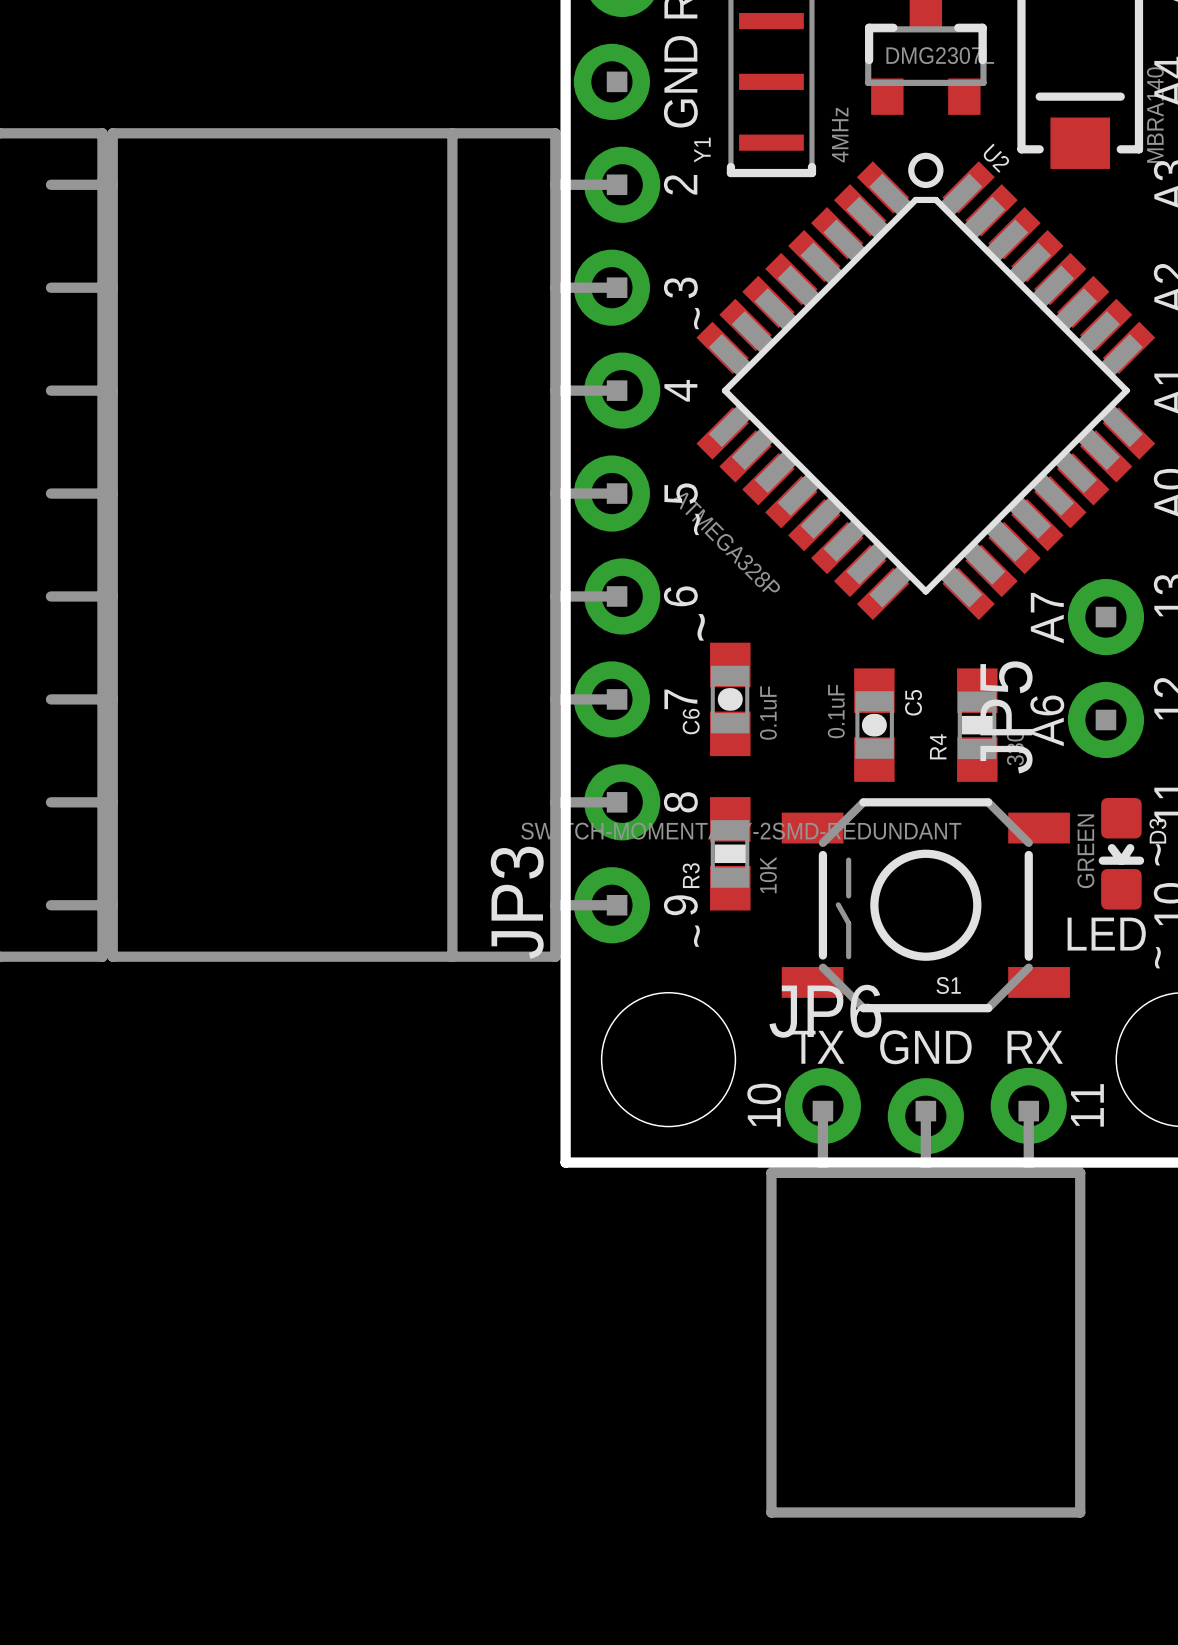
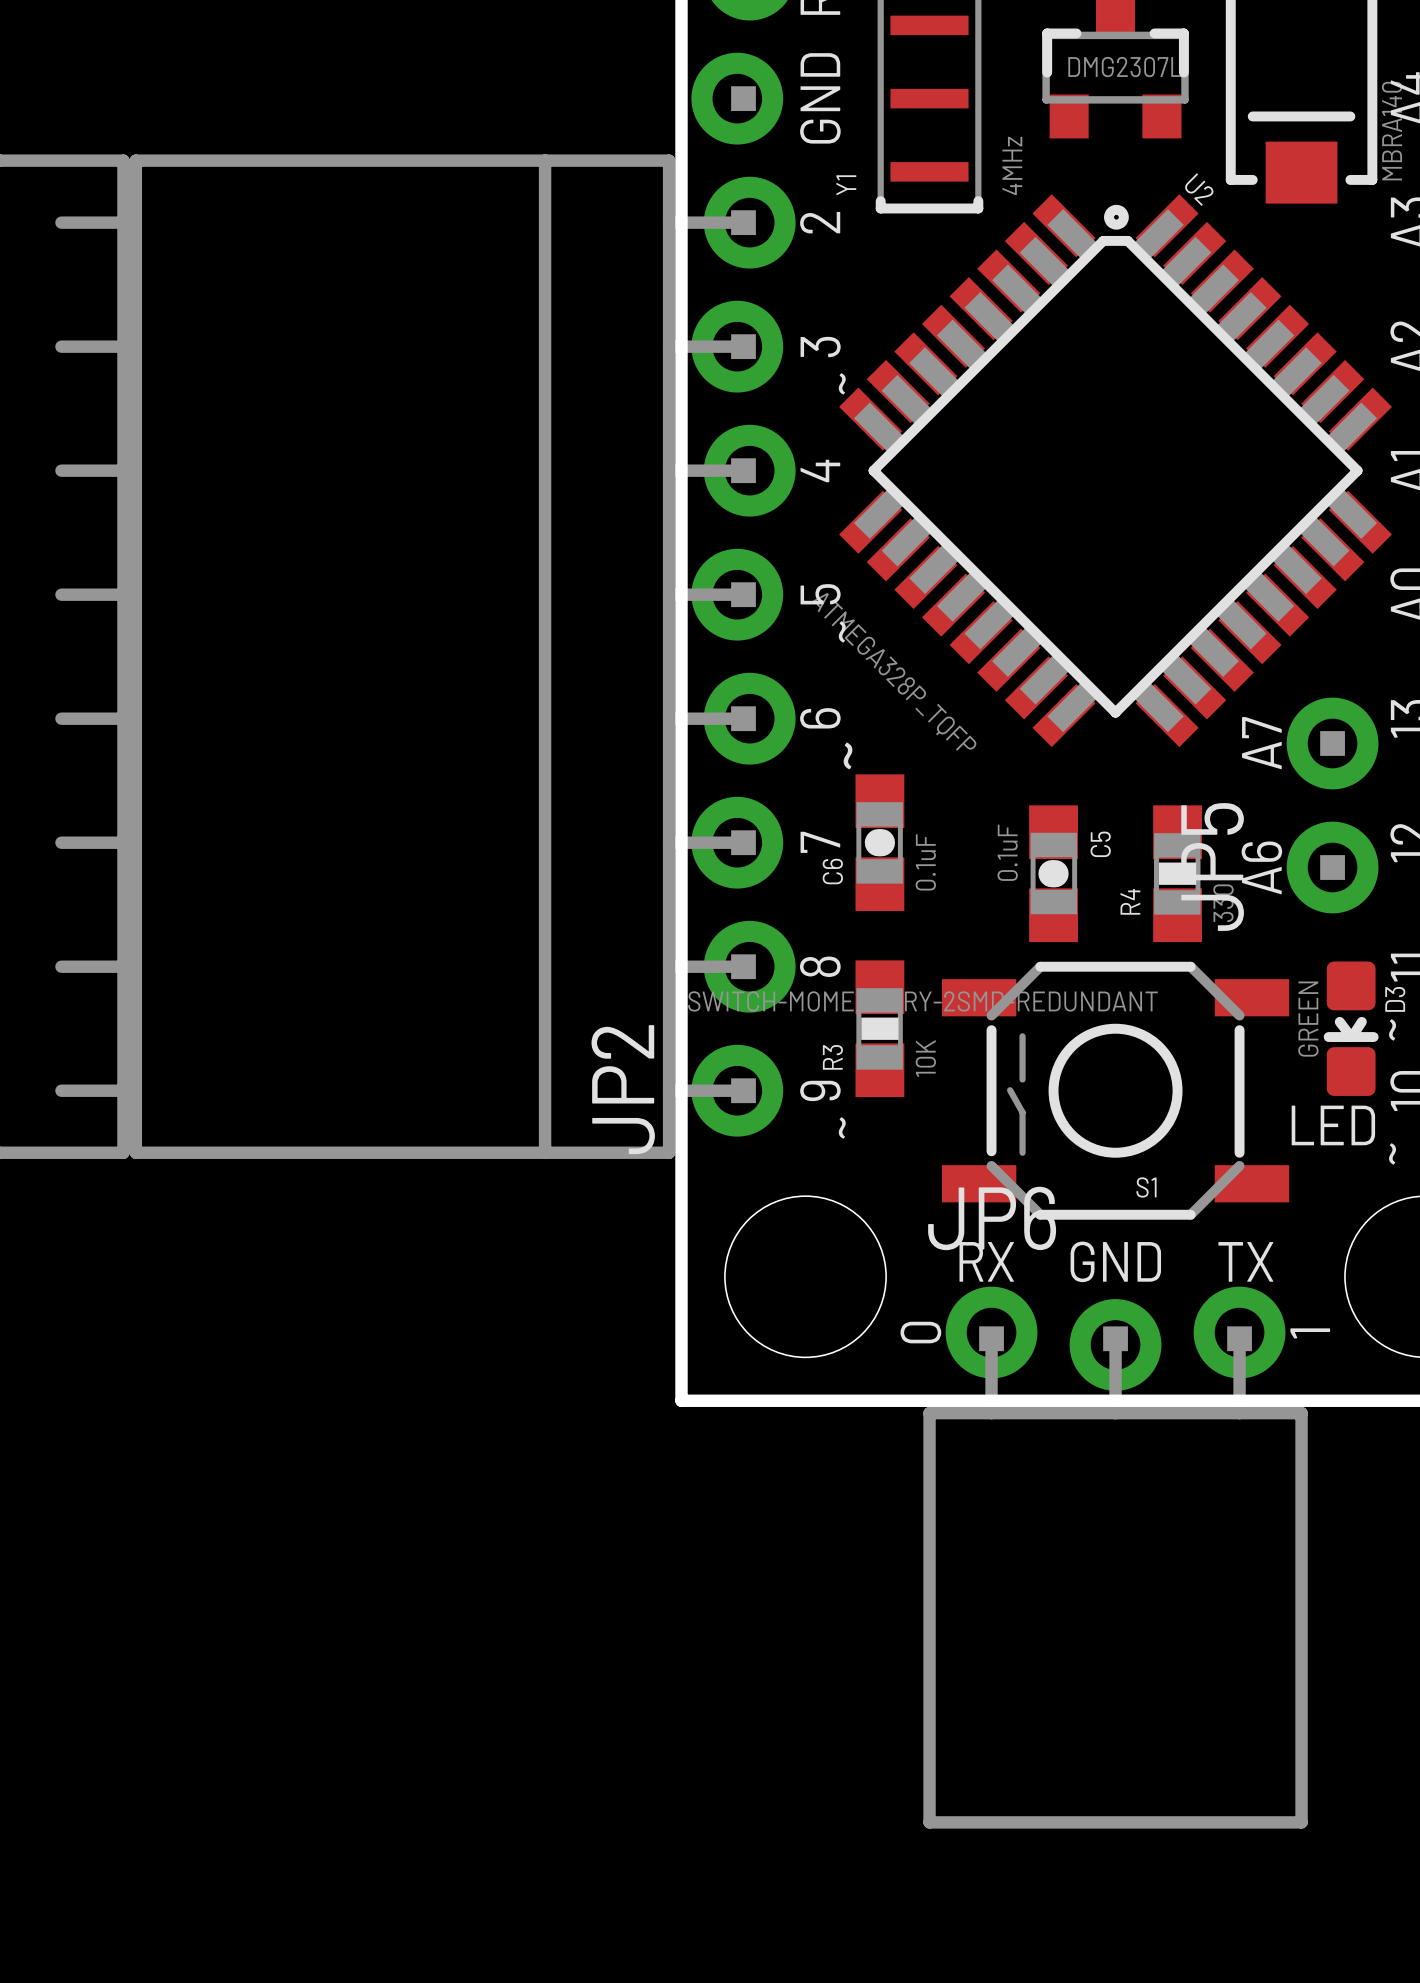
U2 footprint: [696, 152, 1156, 621] -> [839, 194, 1392, 748]
U2 value: ATMEGA328P (725, 542) -> ATMEGA328P_TQFP (892, 671)
JP3 name: JP3 (517, 902) -> JP2 (623, 1089)
text: TX (817, 1047) -> RX (986, 1261)
text: RX (1035, 1047) -> TX (1245, 1261)
text: 10 (764, 1105) -> 0 (920, 1332)
text: 11 (1087, 1105) -> 1 (1310, 1333)

